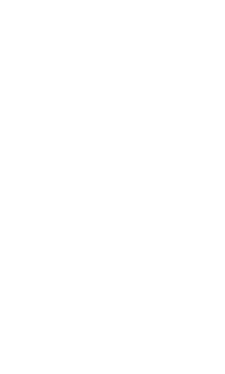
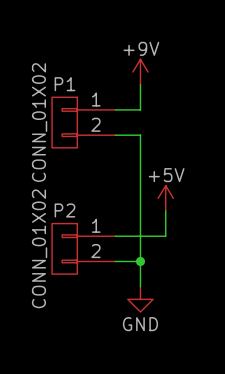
power symbol: none -> +9V (140, 72)
wire: none -> (140, 84) (140, 109) (115, 109)
P1: none -> CONN_01X02 (83, 122)
wire: none -> (115, 135) (140, 135) (140, 286)
power symbol: none -> +5V (165, 198)
wire: none -> (165, 210) (165, 236) (115, 236)
P2: none -> CONN_01X02 (83, 248)
wire: none -> (115, 261) (140, 261)
junction: none -> (140, 261)
power symbol: none -> GND (140, 299)

